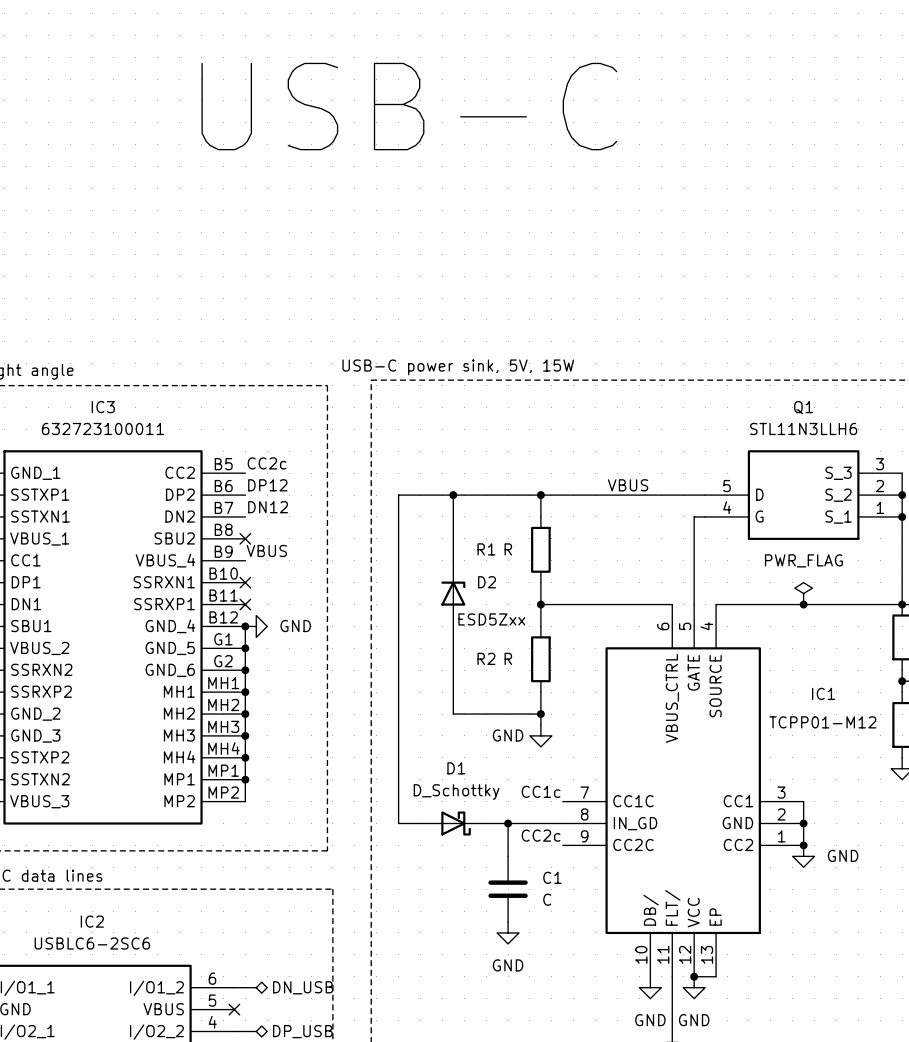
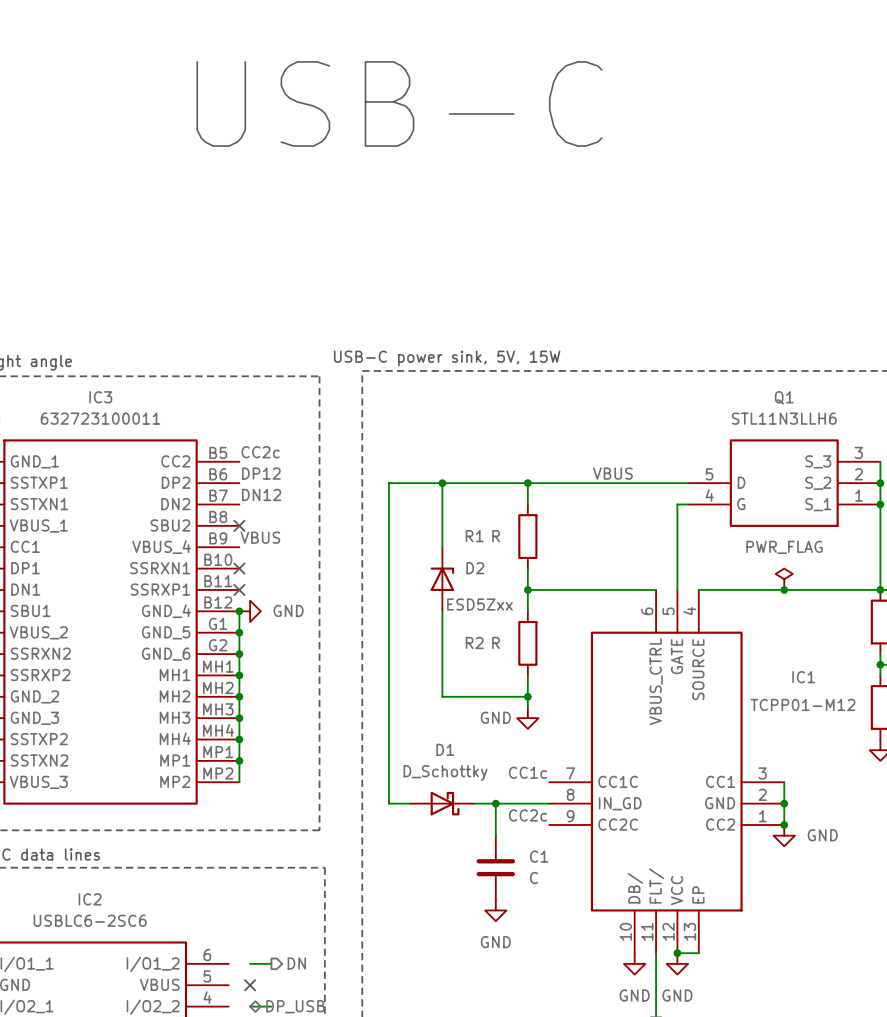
wire: (234, 987) (256, 987) -> (271, 963) (250, 963)
hierarchical label: DN_USB (303, 987) -> none
hierarchical label: none -> DN (296, 963)
no-connect mark position: (234, 1009) -> (250, 985)
wire: (234, 1031) (256, 1031) -> (271, 1006) (250, 1006)

